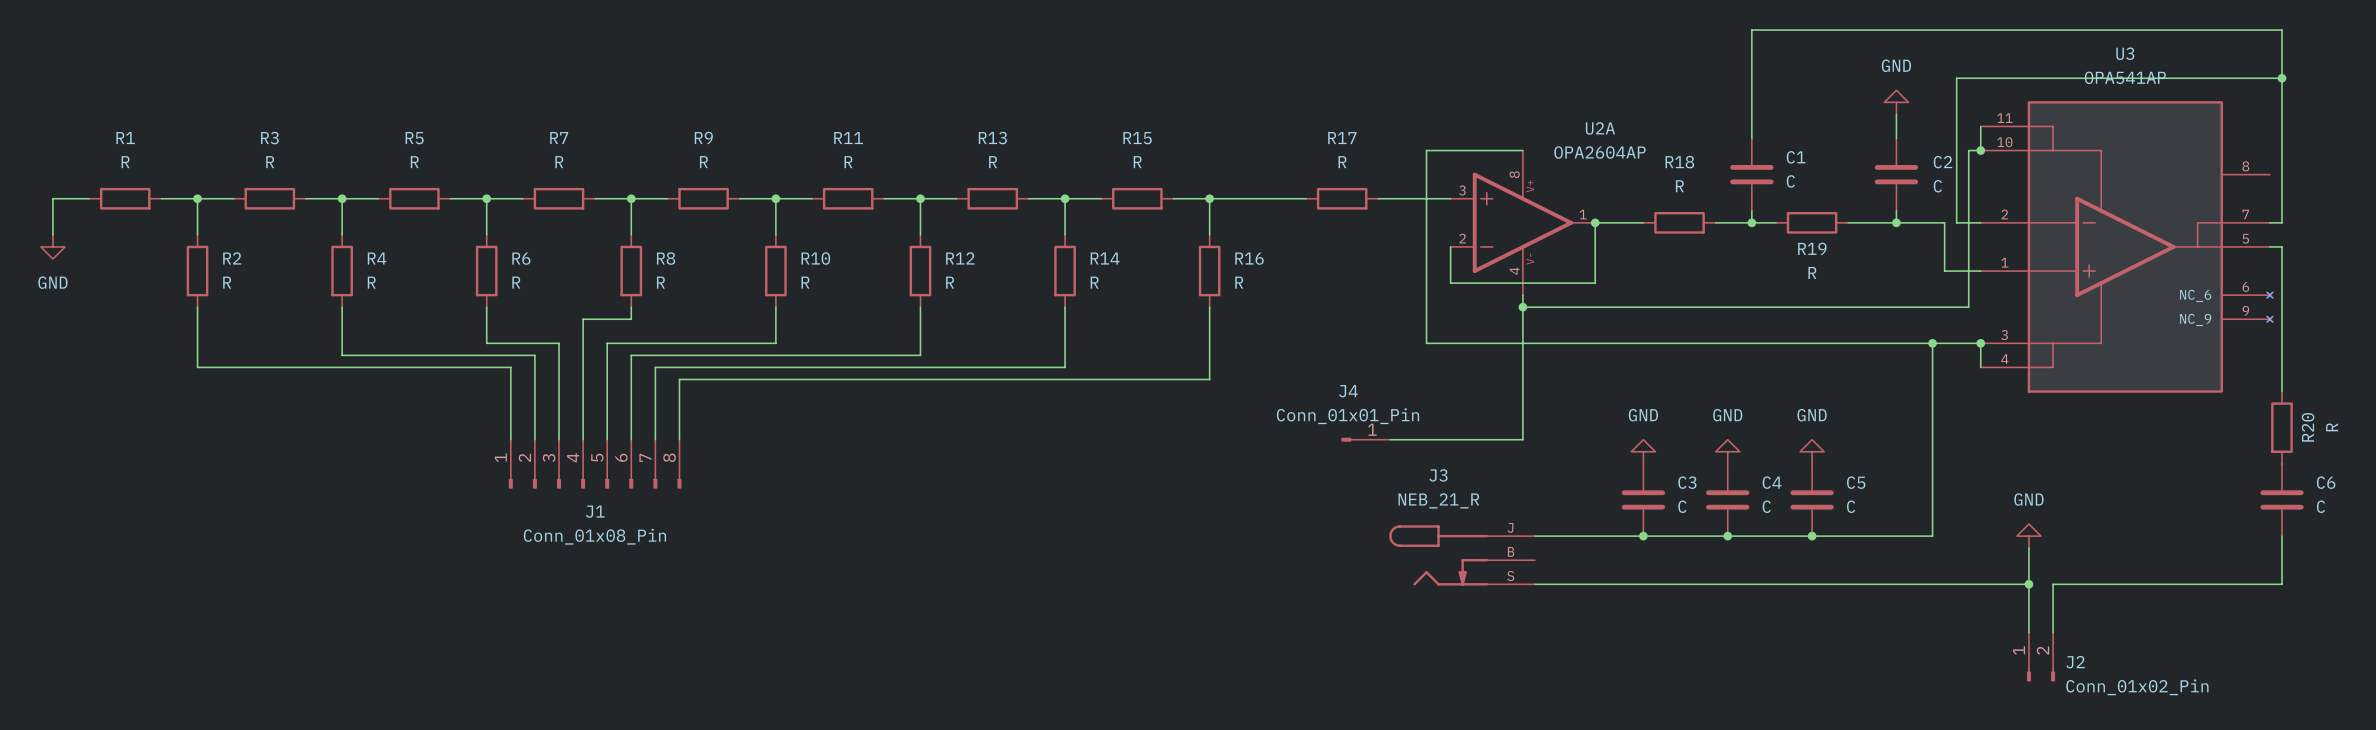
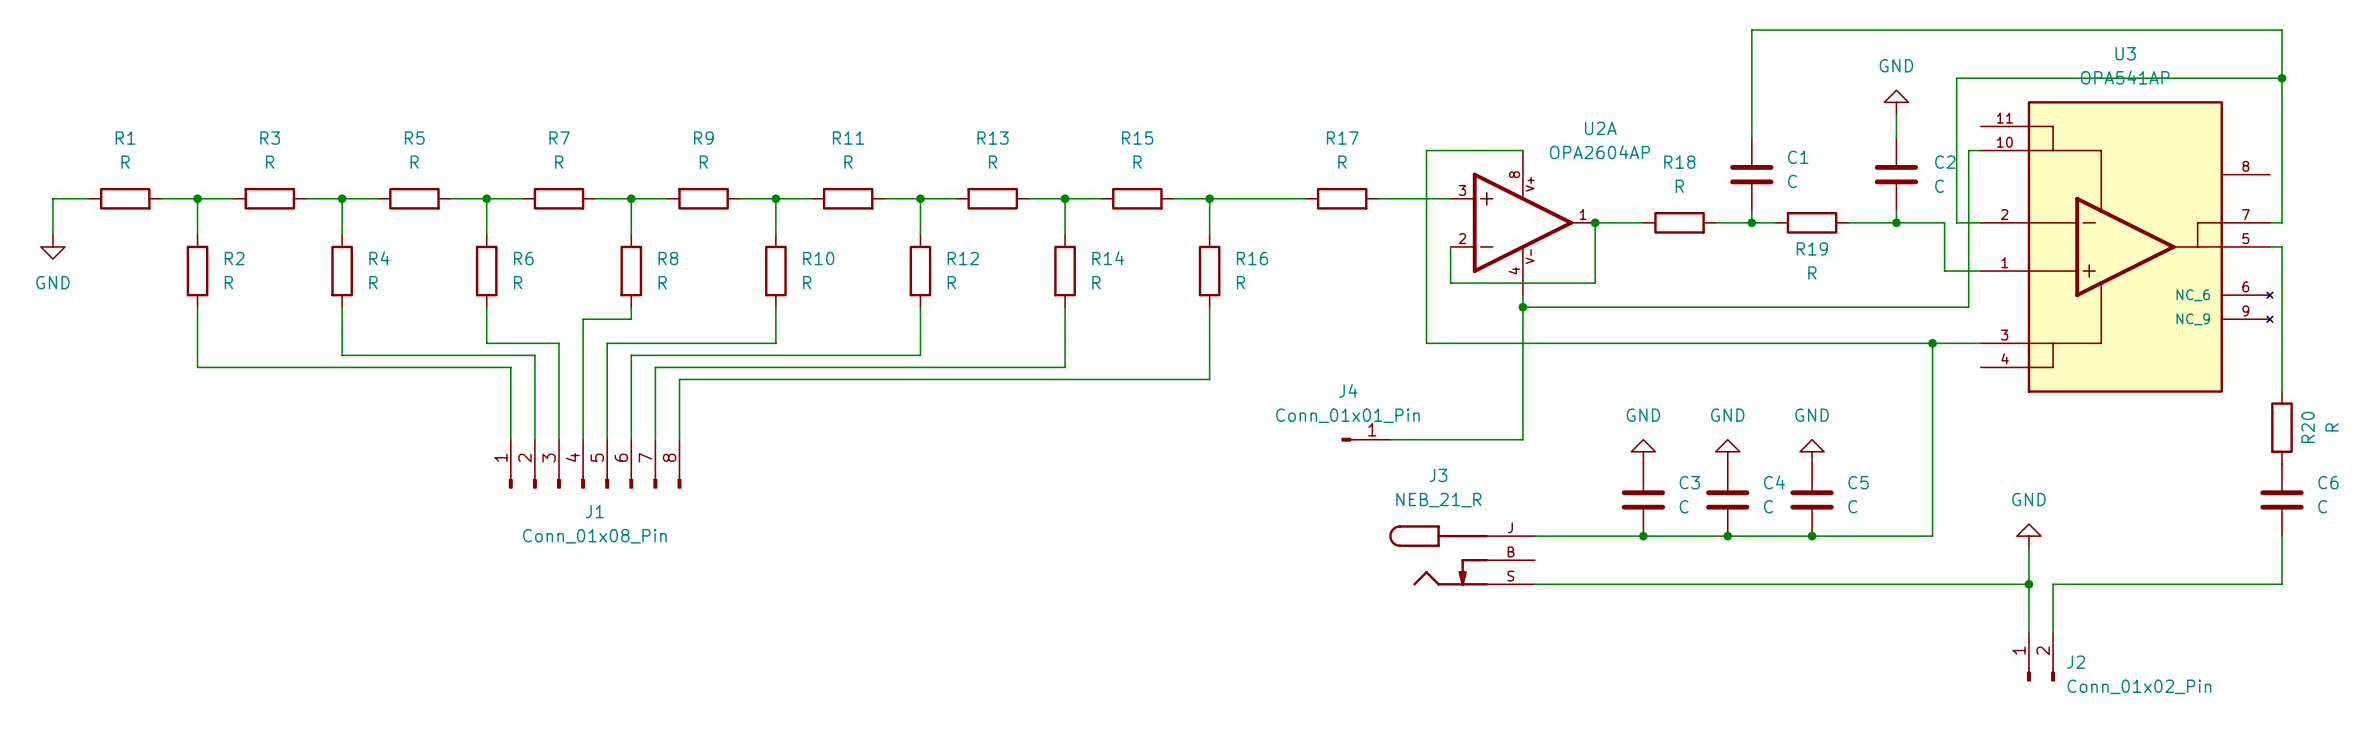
wire: (1980, 126) (1980, 150) -> none
junction: (1980, 150) -> none
wire: (1980, 343) (1980, 367) -> none
junction: (1980, 343) -> none

